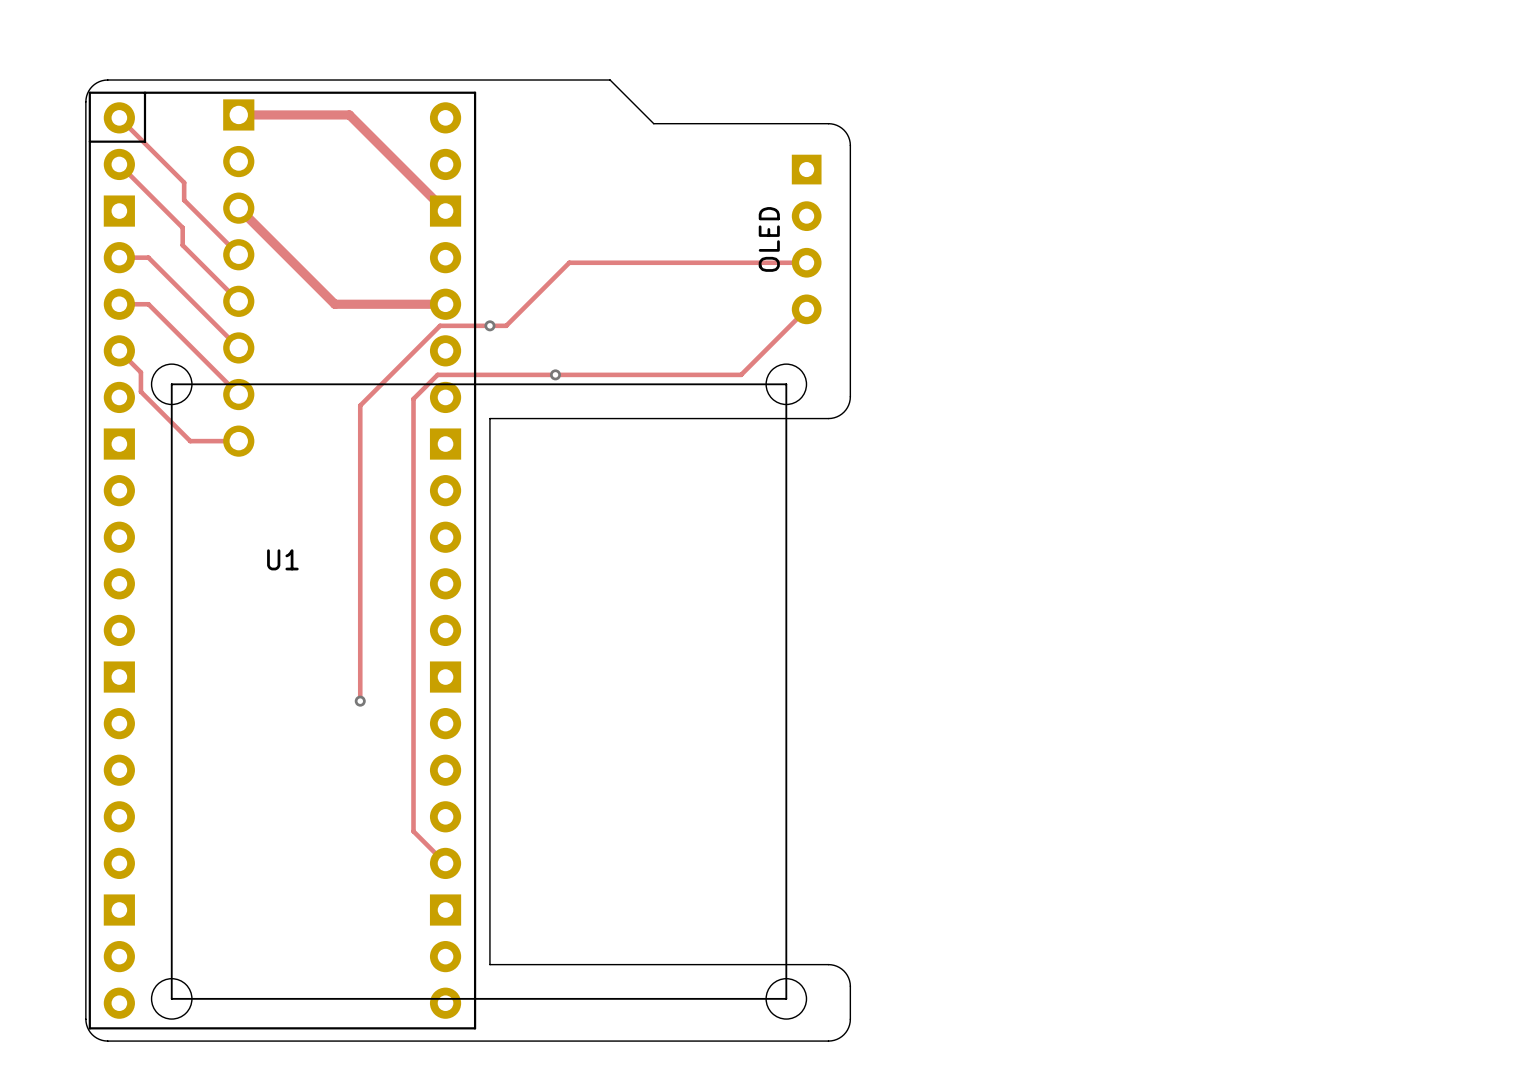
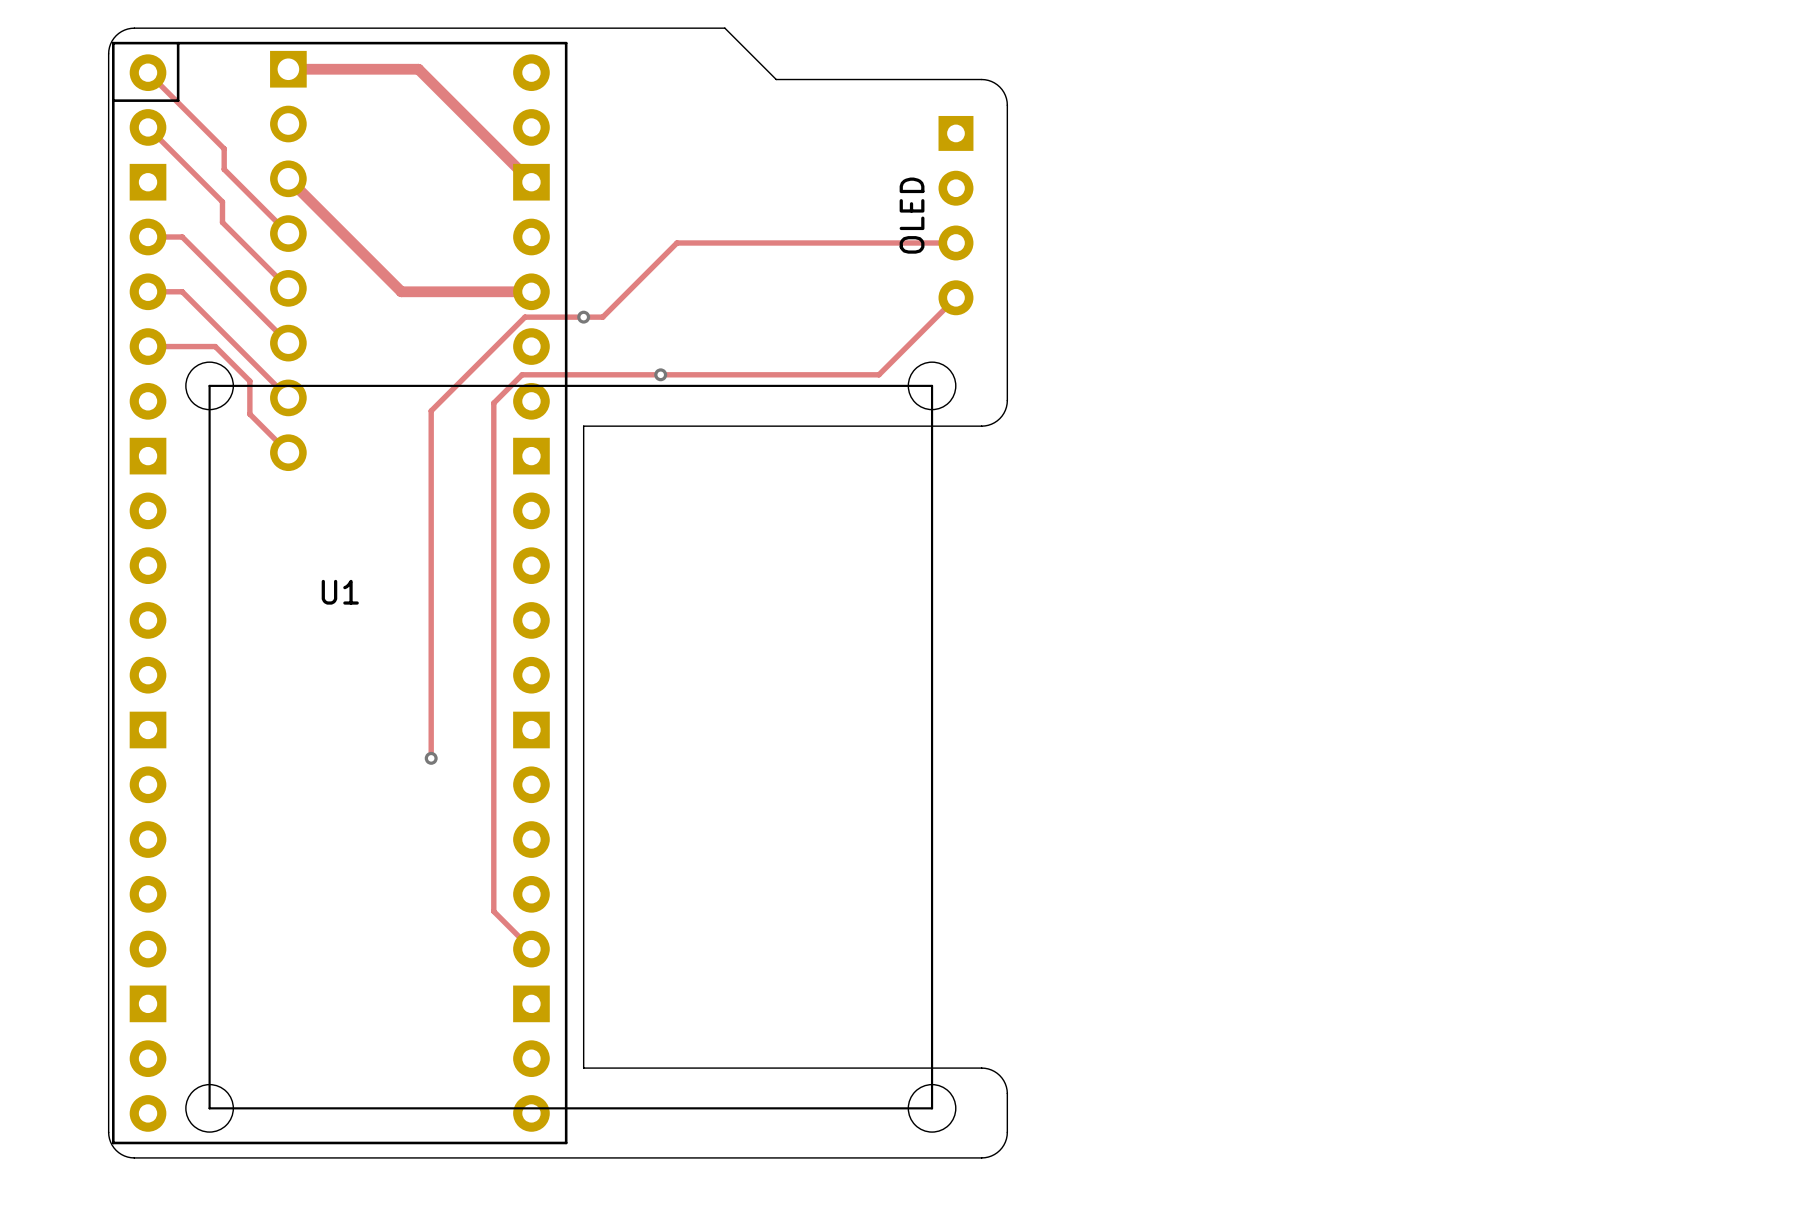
track: (119, 350) (140, 372) (140, 391) (190, 441) (238, 441) -> (148, 346) (215, 346) (249, 381) (249, 414) (288, 452)

